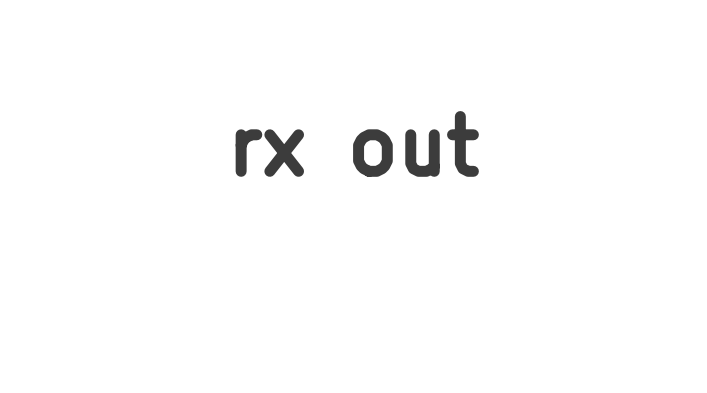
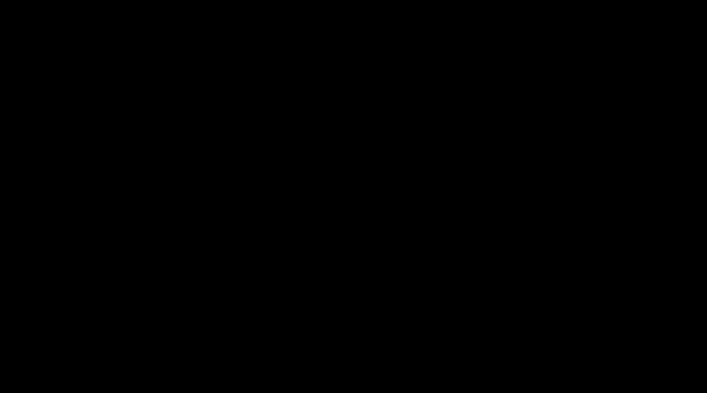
text: rx out (357, 143) -> none

